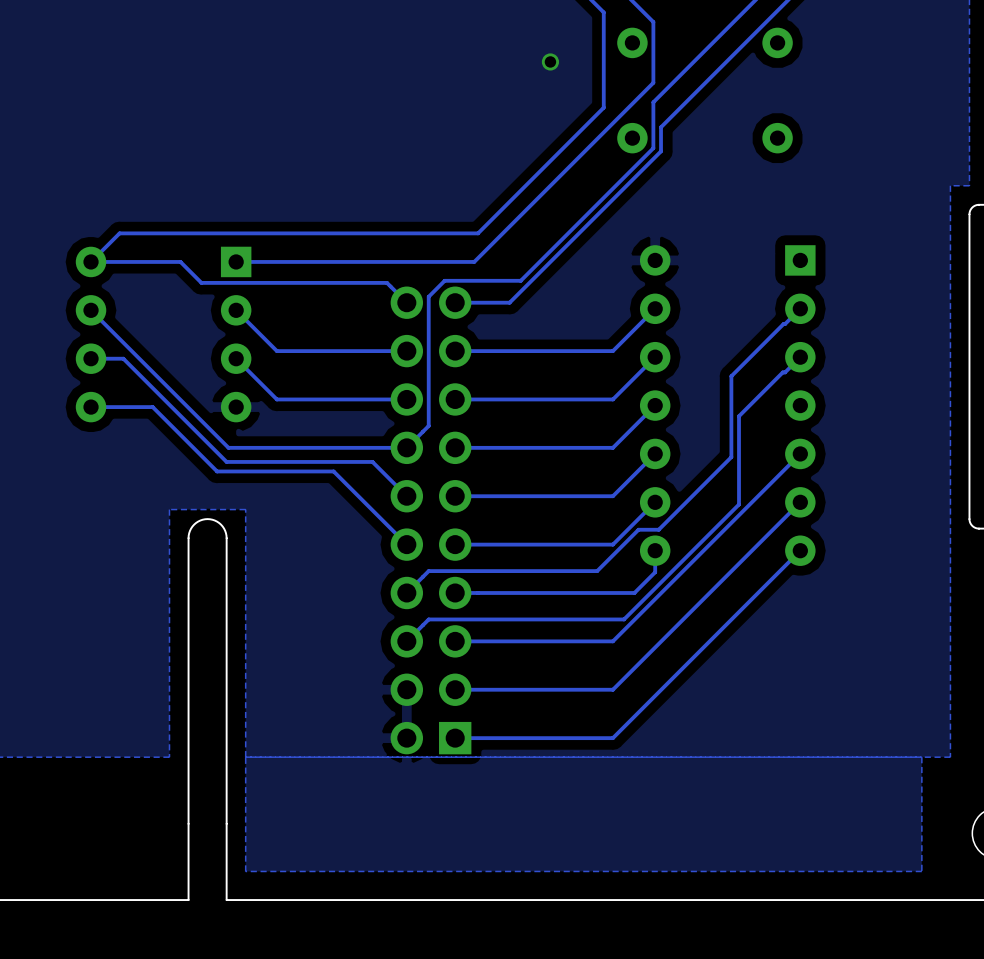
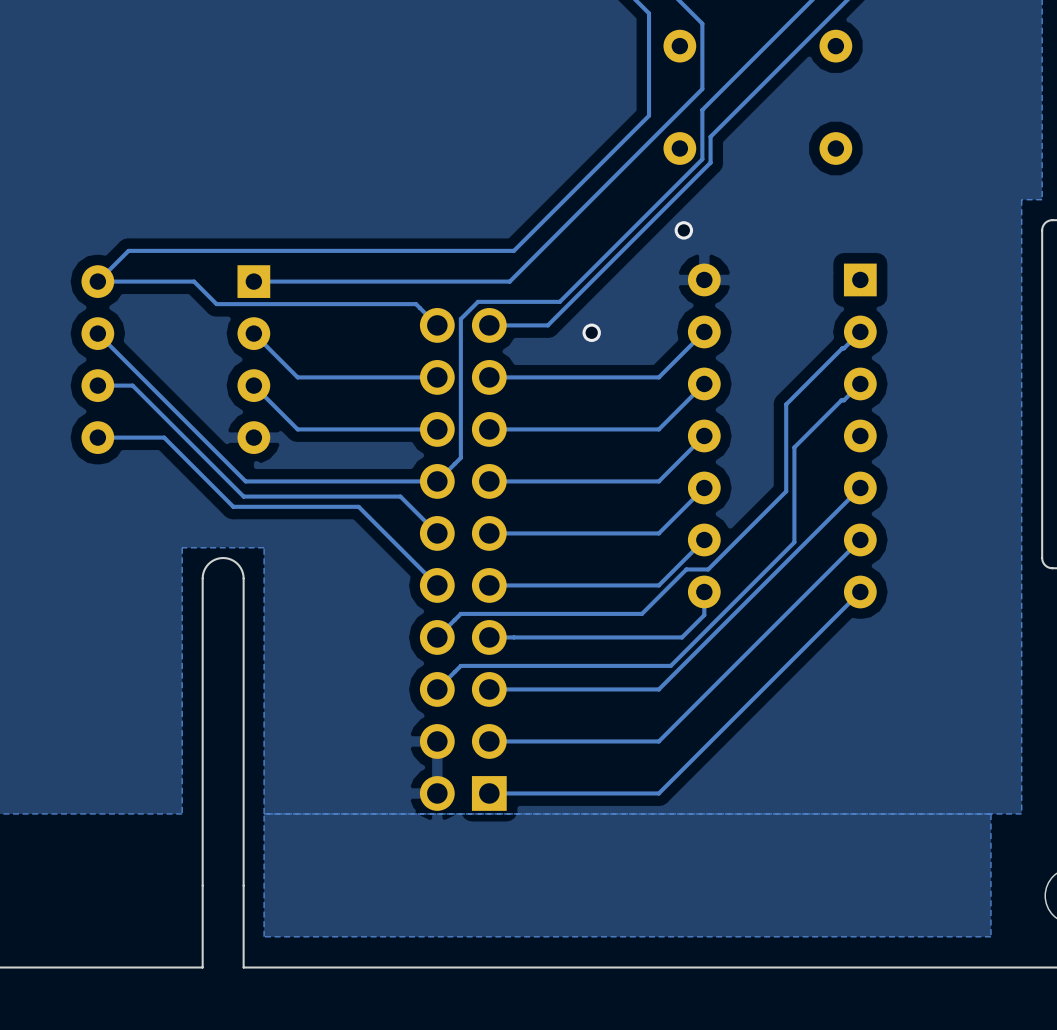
via: (550, 61) -> none
via: none -> (683, 230)
via: none -> (591, 332)

